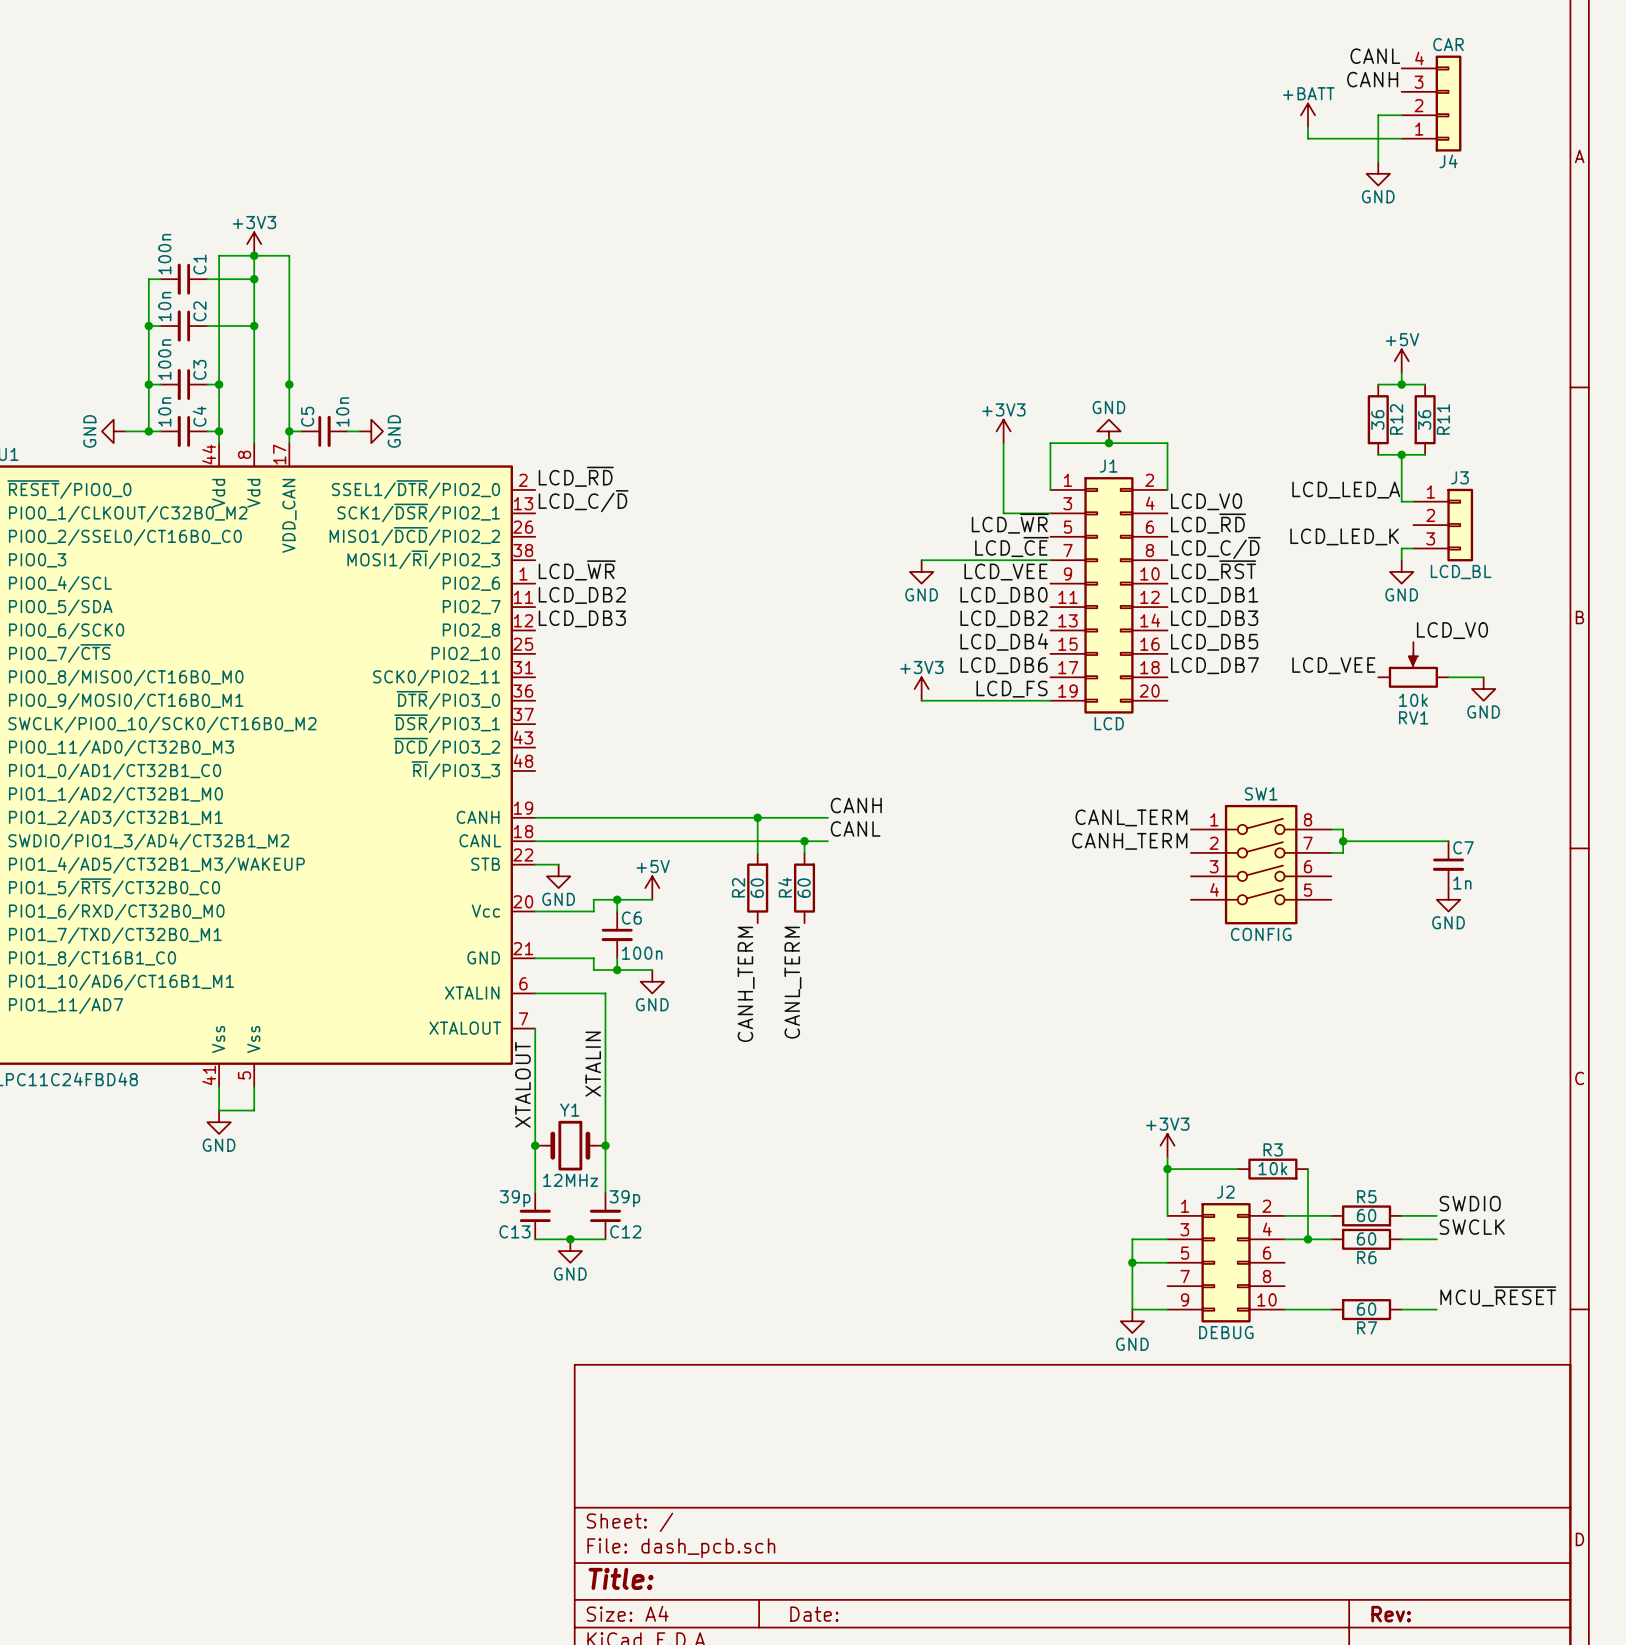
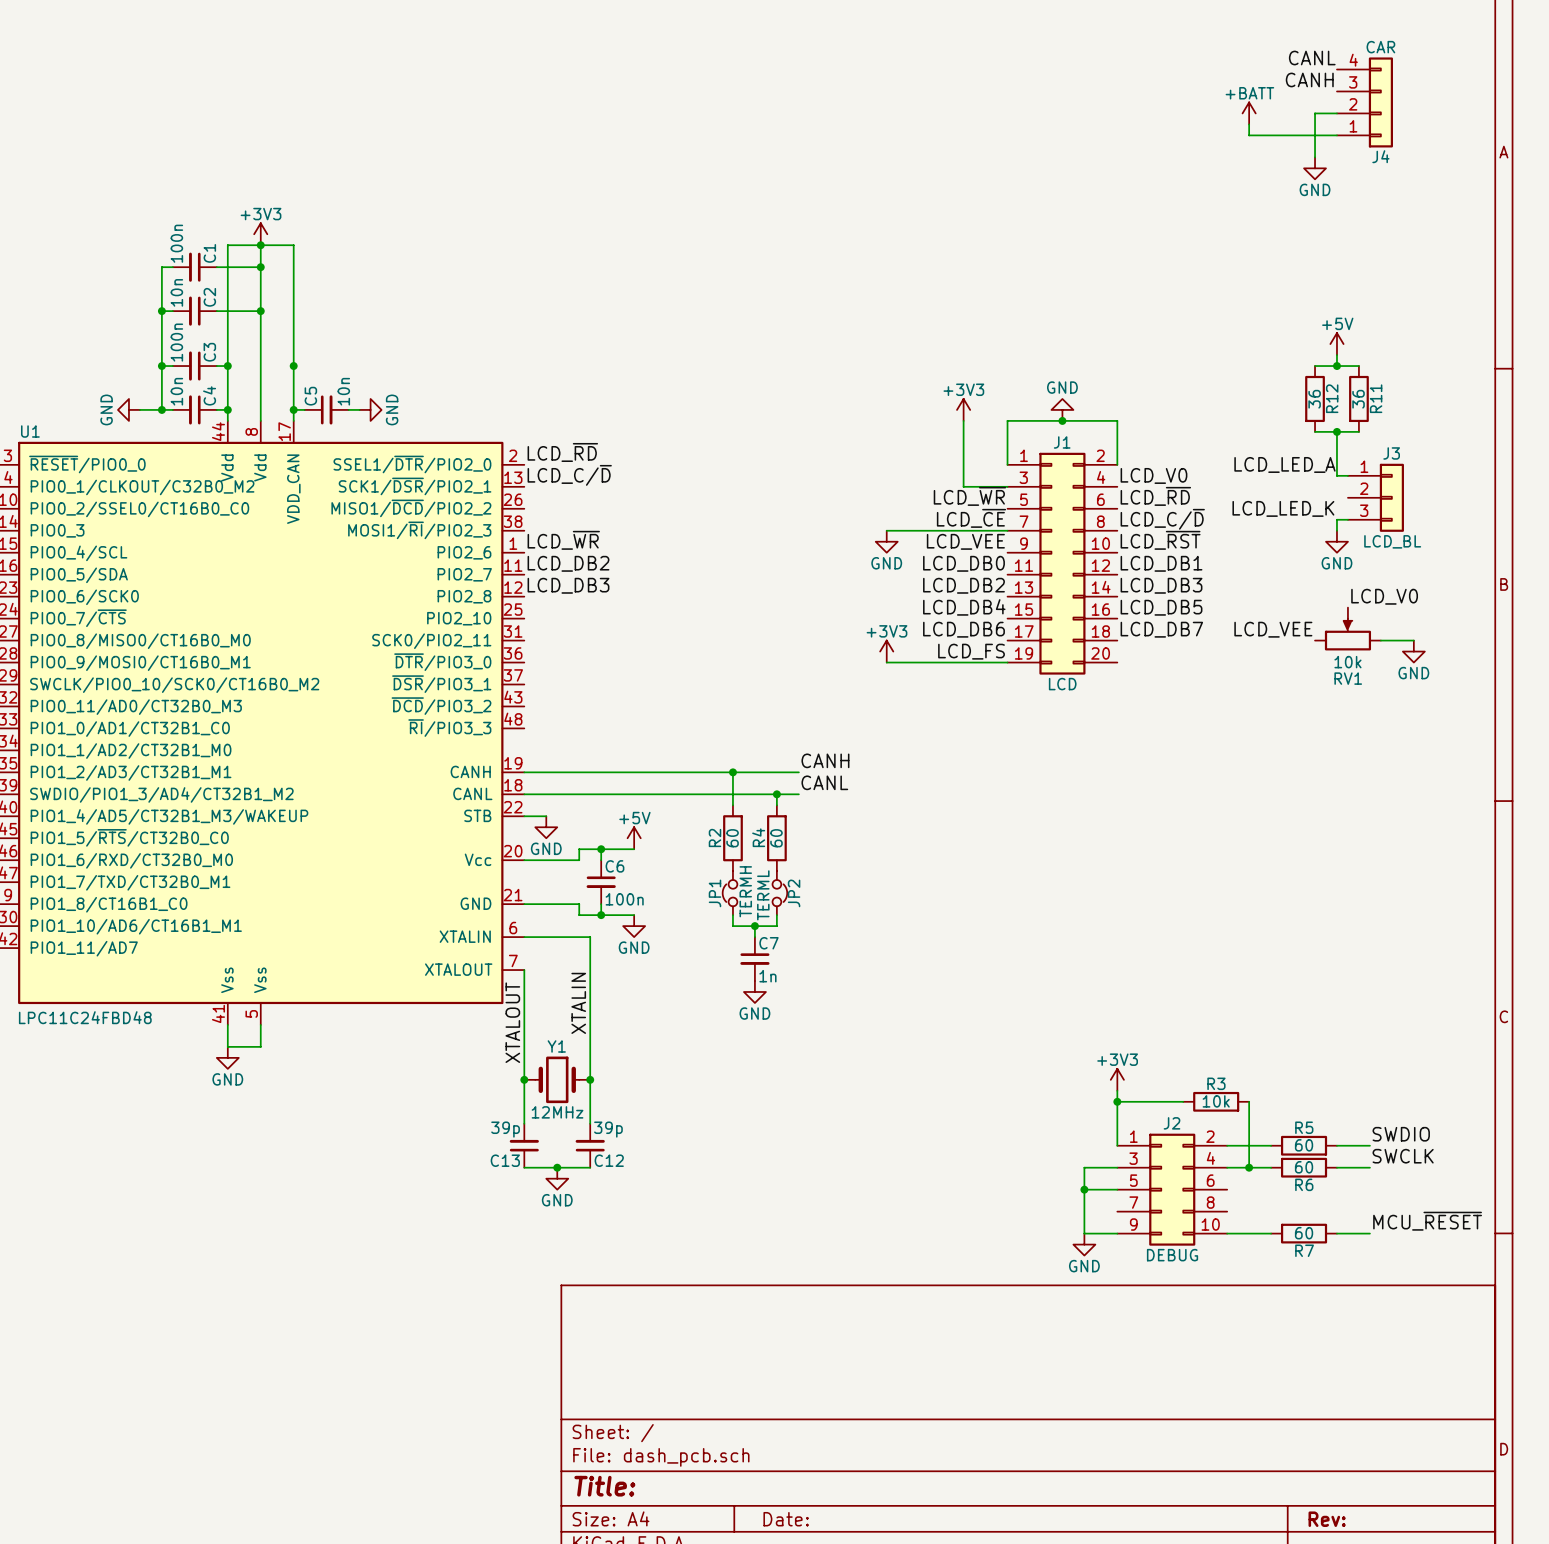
label: CANL_TERM (1131, 817) -> none
wire: (1331, 829) (1343, 829) (1343, 852) (1331, 852) -> none
label: CANH_TERM (1129, 841) -> none
wire: (1343, 841) (1448, 841) -> none
junction: (1343, 841) -> none
SW1: CONFIG (1261, 864) -> none
C7 position: (1448, 864) -> (754, 959)
power symbol: GND (1448, 899) -> none
JP1: none -> TERMH (730, 893)
JP2: none -> TERML (779, 893)
wire: none -> (732, 915) (732, 926) (776, 926) (776, 915)
wire: none -> (754, 926) (754, 937)
junction: none -> (754, 926)
label: CANL_TERM (792, 982) -> none
label: CANH_TERM (746, 984) -> none
power symbol: none -> GND (754, 991)

